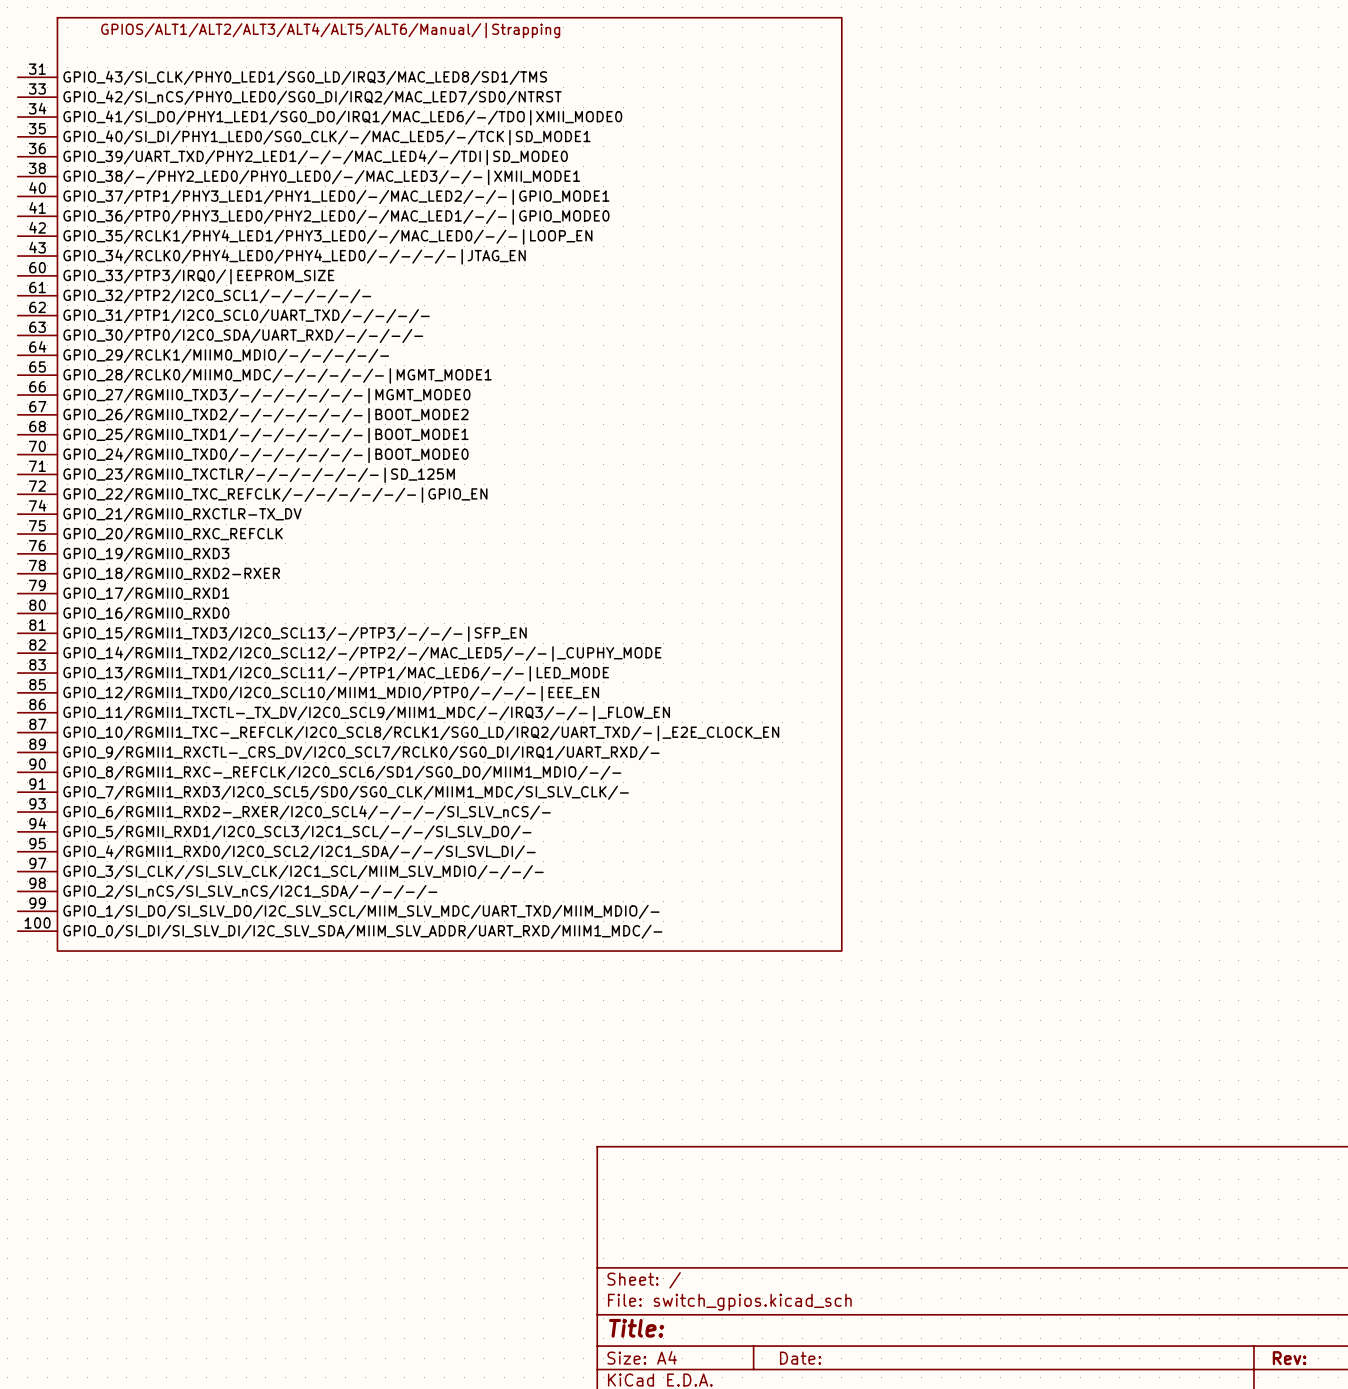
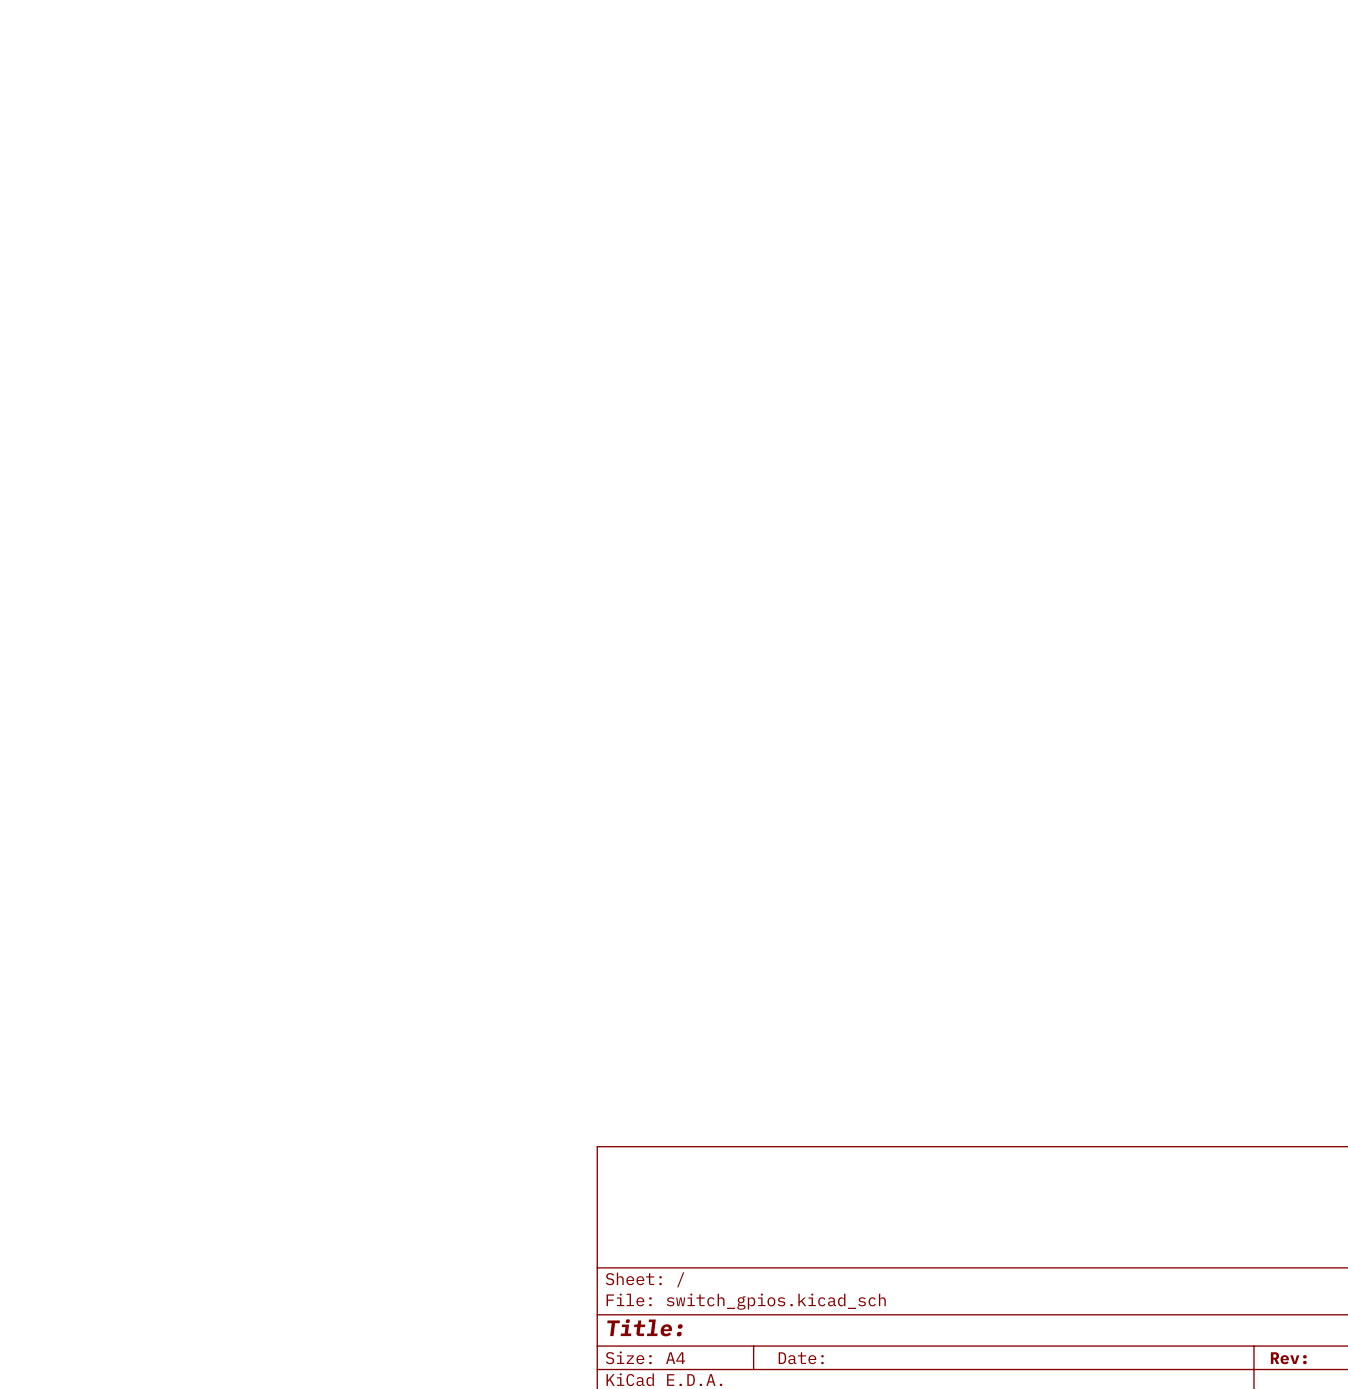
part: (429, 484) -> none

